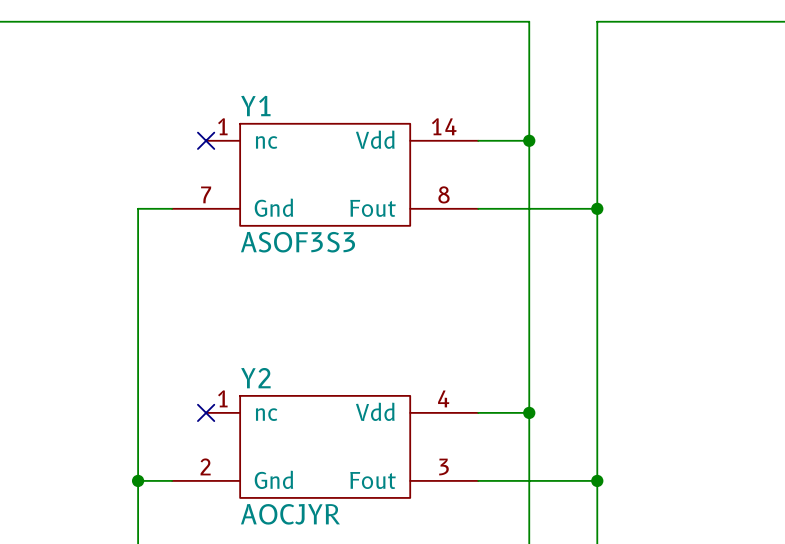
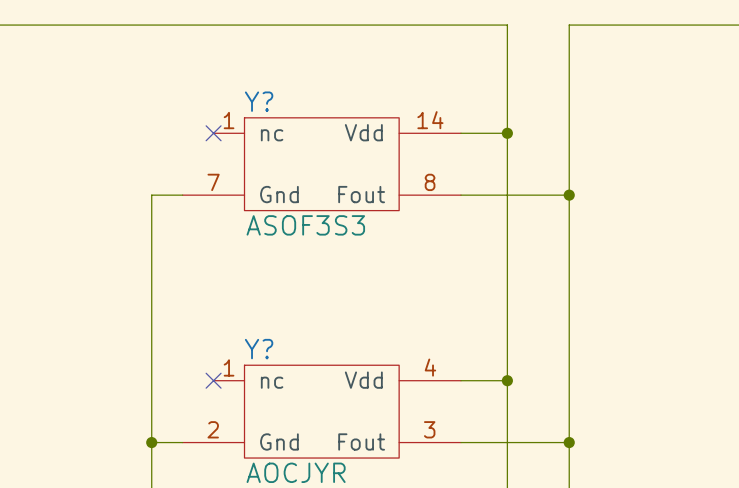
Y1 name: Y1 (255, 106) -> Y? (259, 101)
Y2 name: Y2 (255, 378) -> Y? (259, 349)

